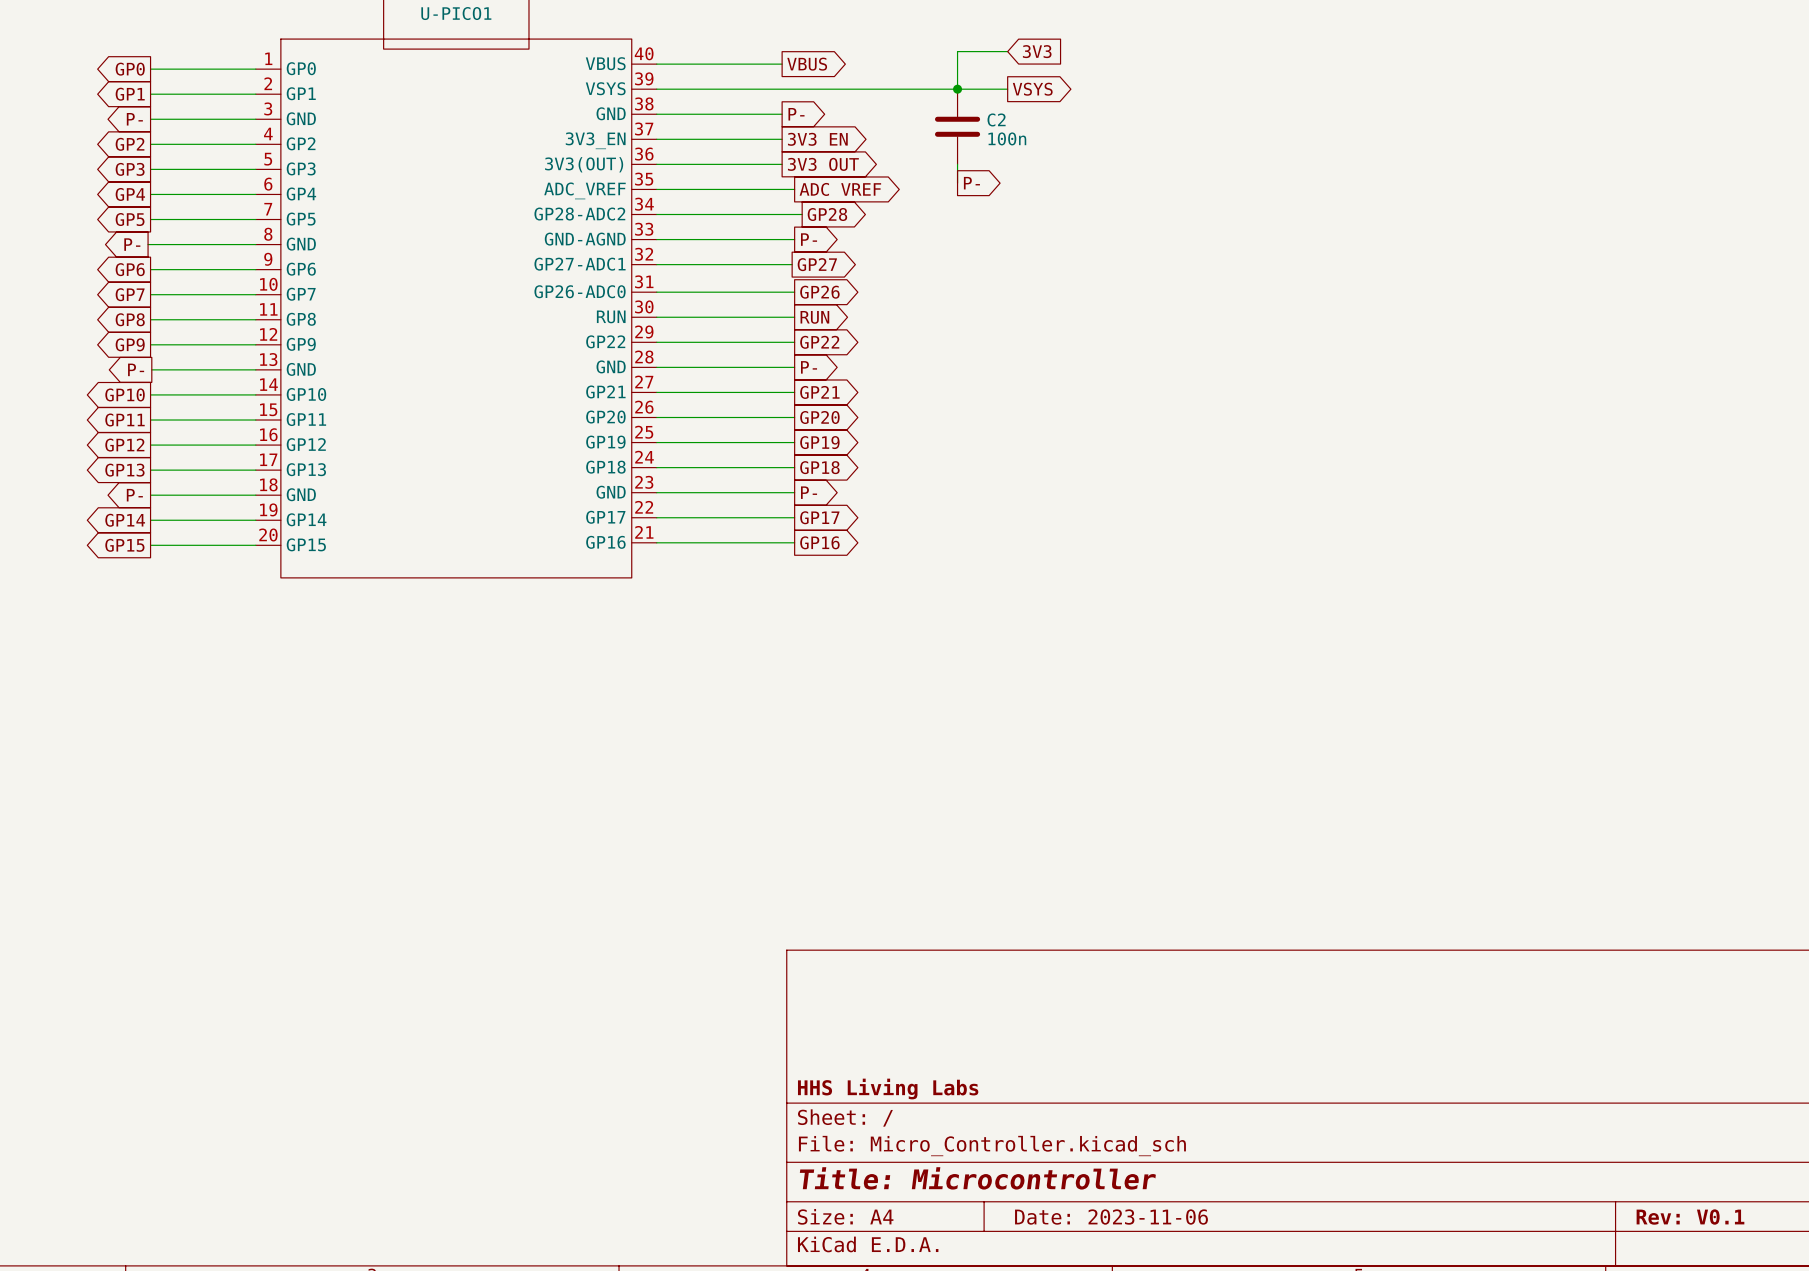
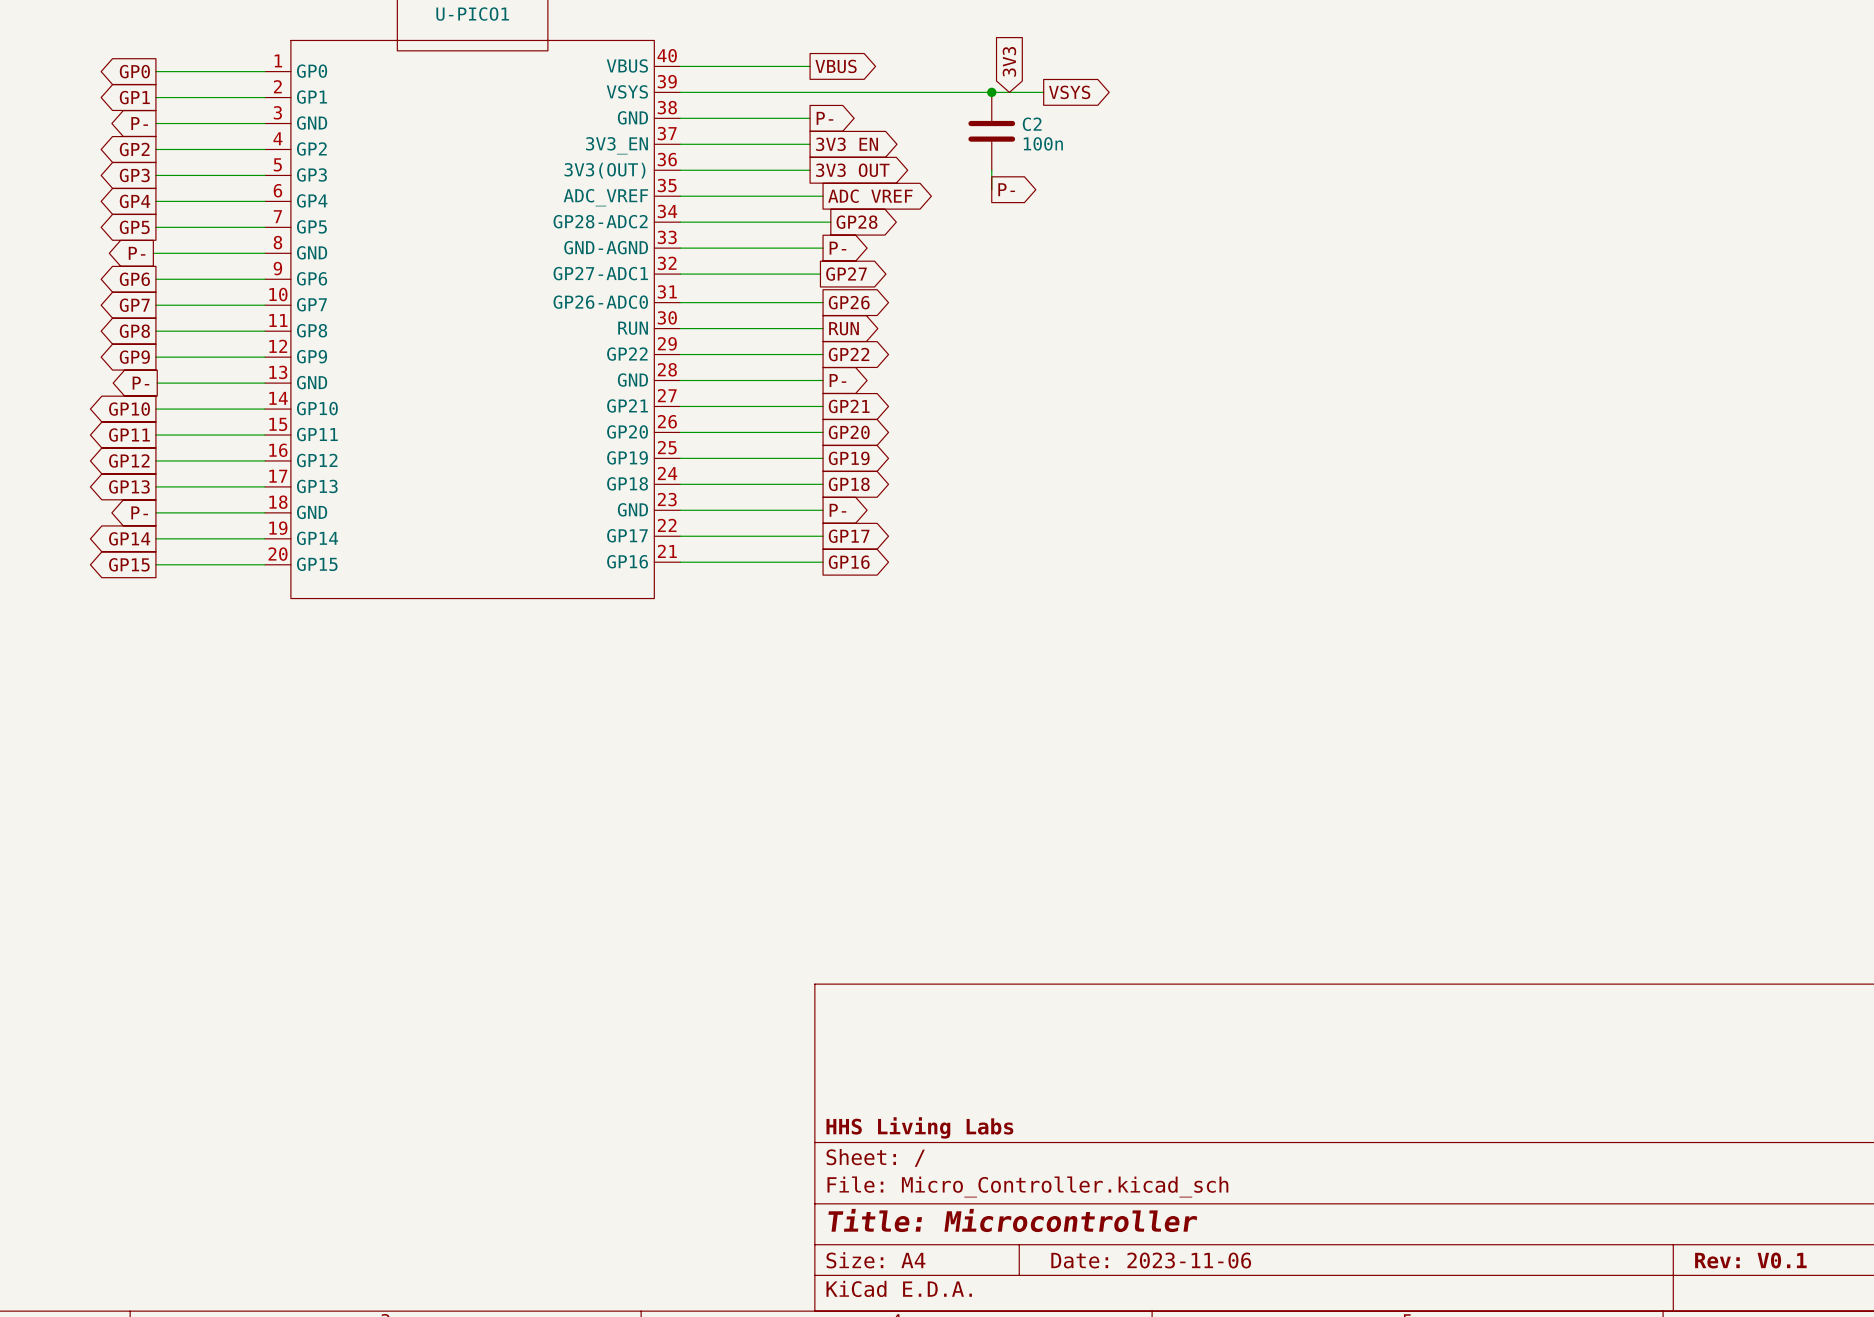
wire: (1007, 51) (957, 51) (957, 89) -> none
global label rotation: 0° (1037, 51) -> 90° counterclockwise (1009, 61)

